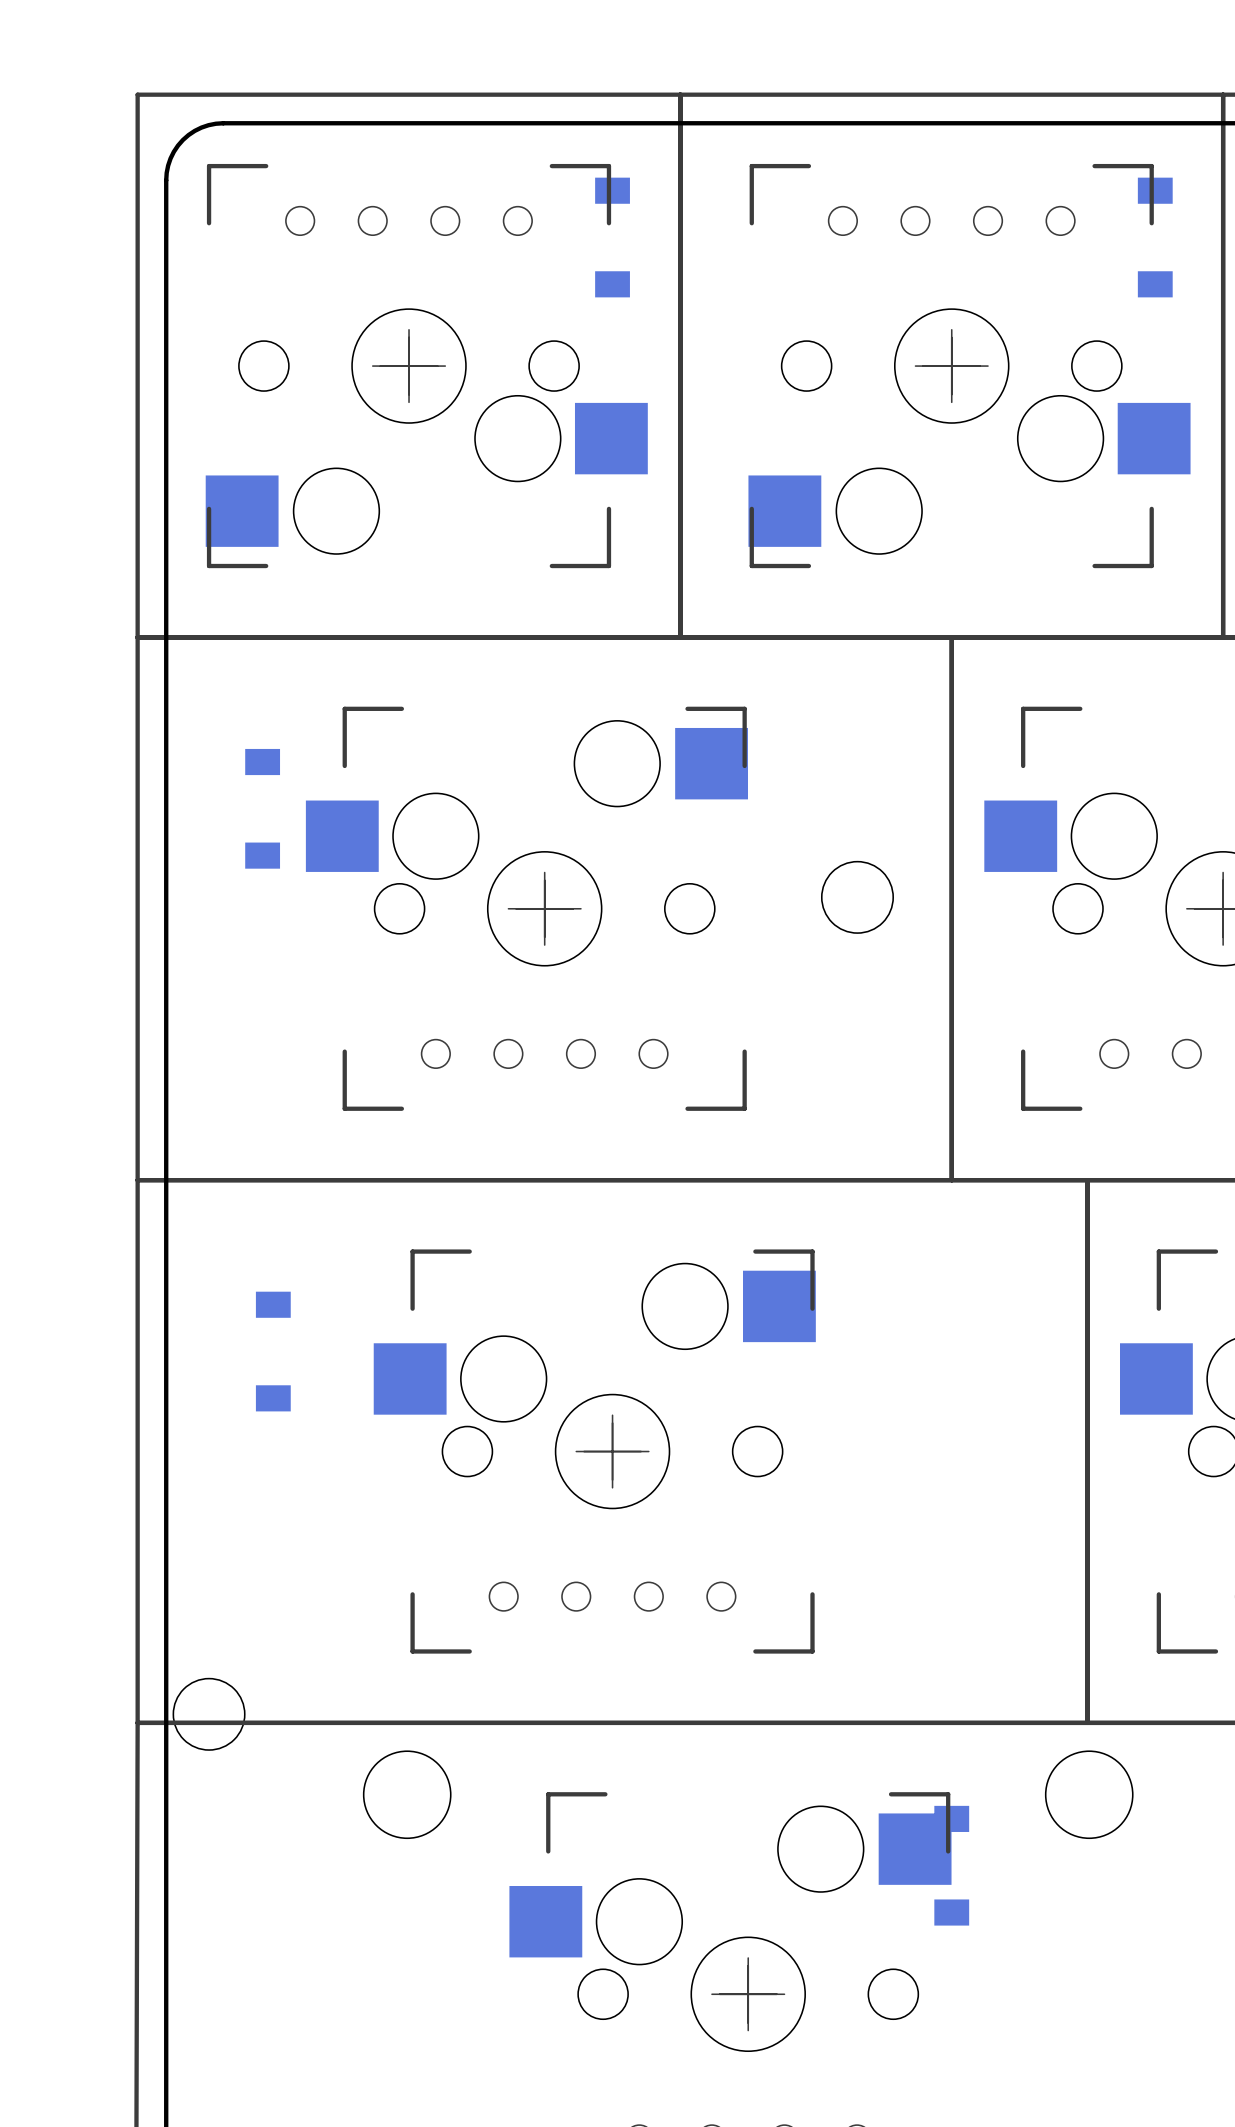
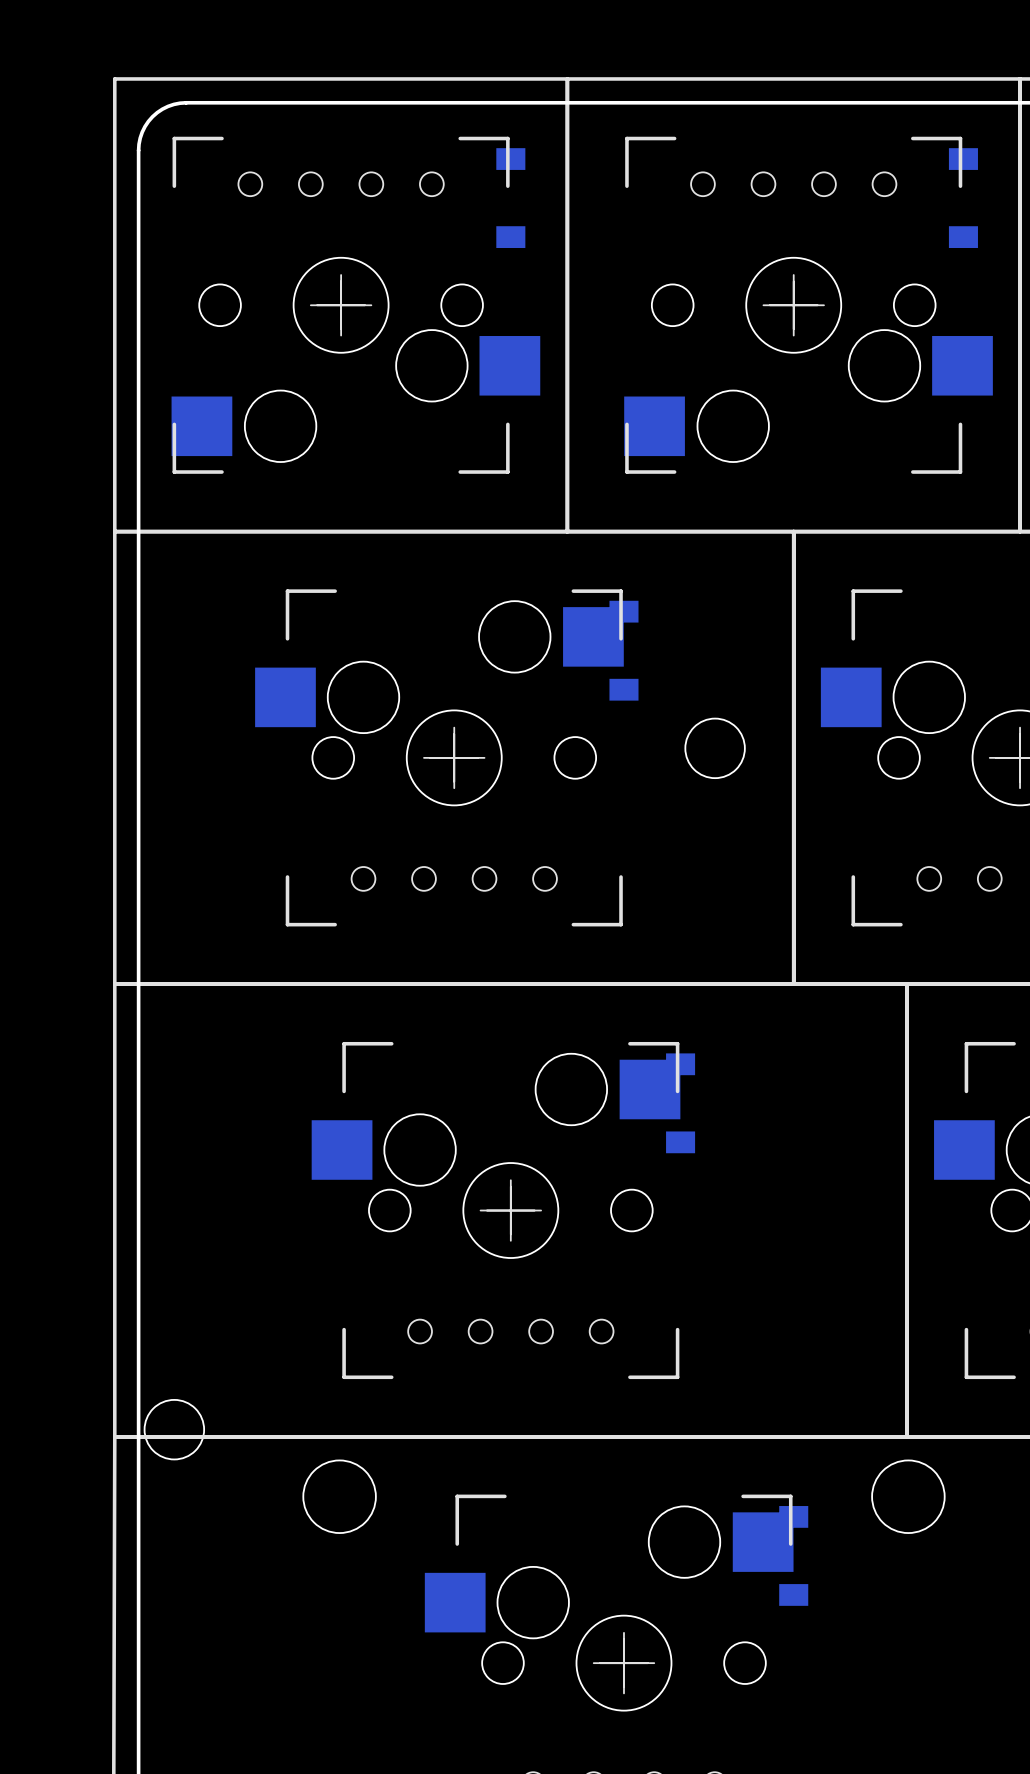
part: none -> (623, 650)
part: (262, 808) -> none
part: none -> (680, 1103)
part: (273, 1351) -> none

